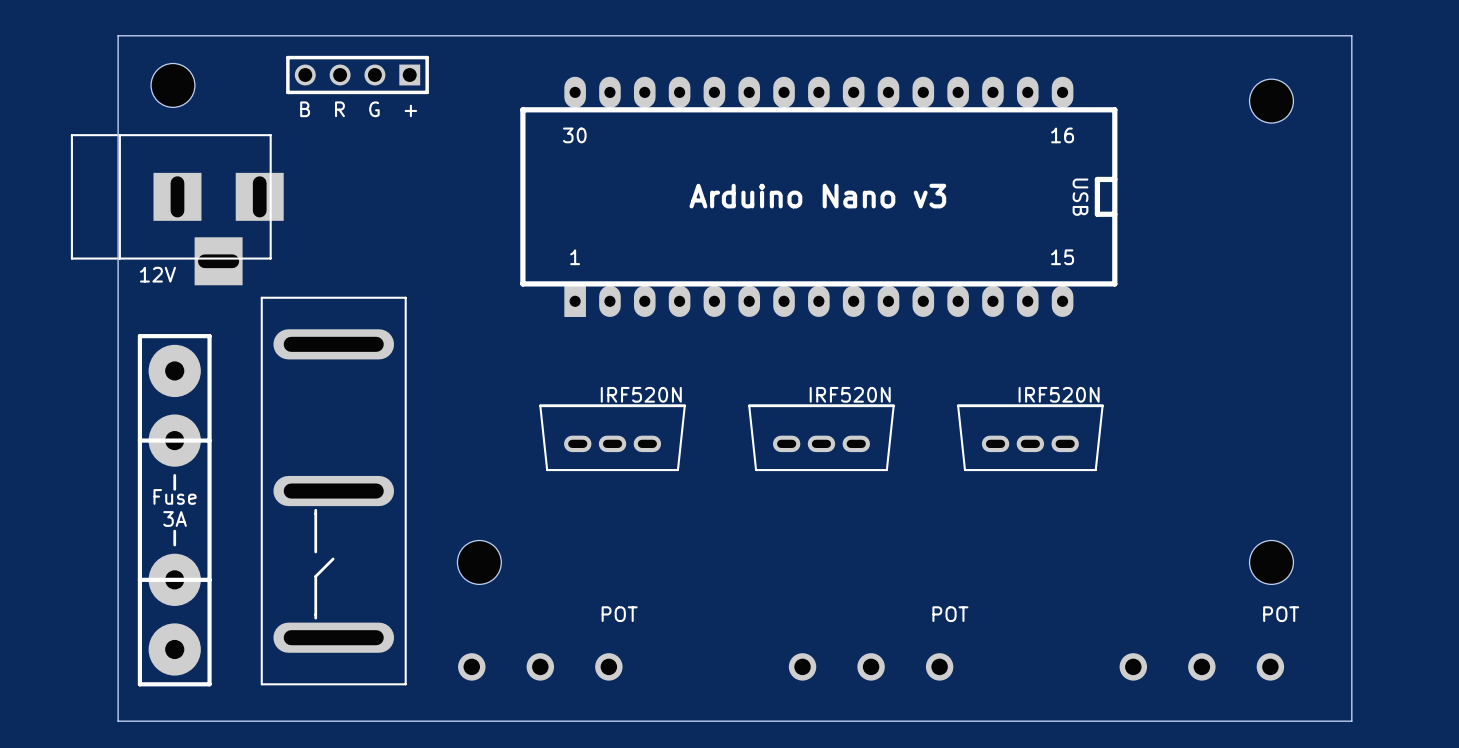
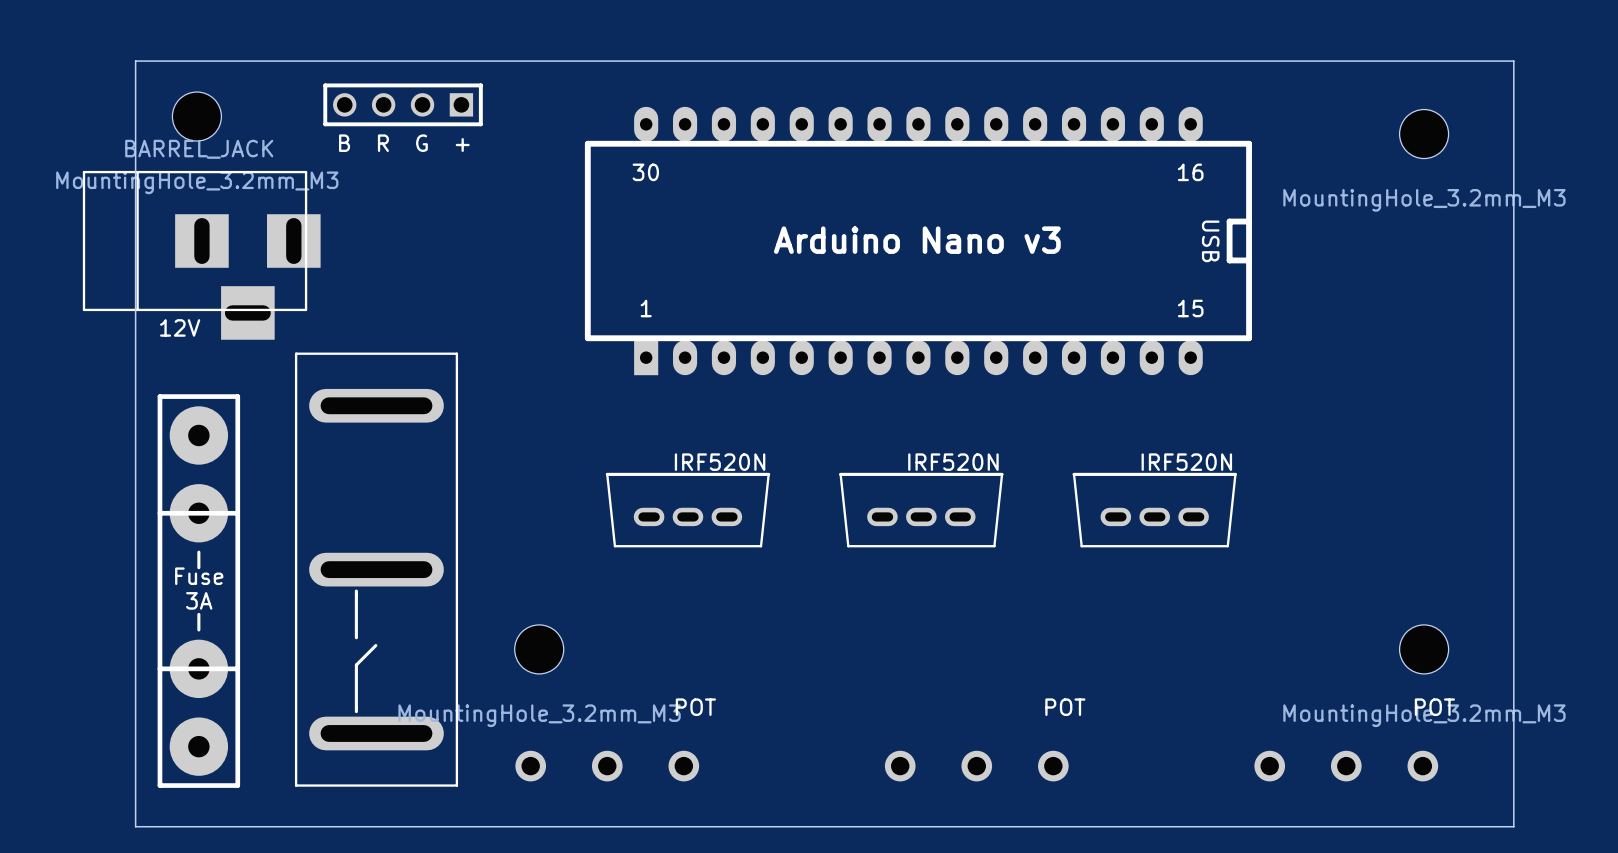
part value: none -> BARREL_JACK (199, 149)
part value: none -> MountingHole_3.2mm_M3 (197, 182)
part value: none -> MountingHole_3.2mm_M3 (1424, 200)
part value: none -> MountingHole_3.2mm_M3 (539, 715)
part value: none -> MountingHole_3.2mm_M3 (1424, 715)

